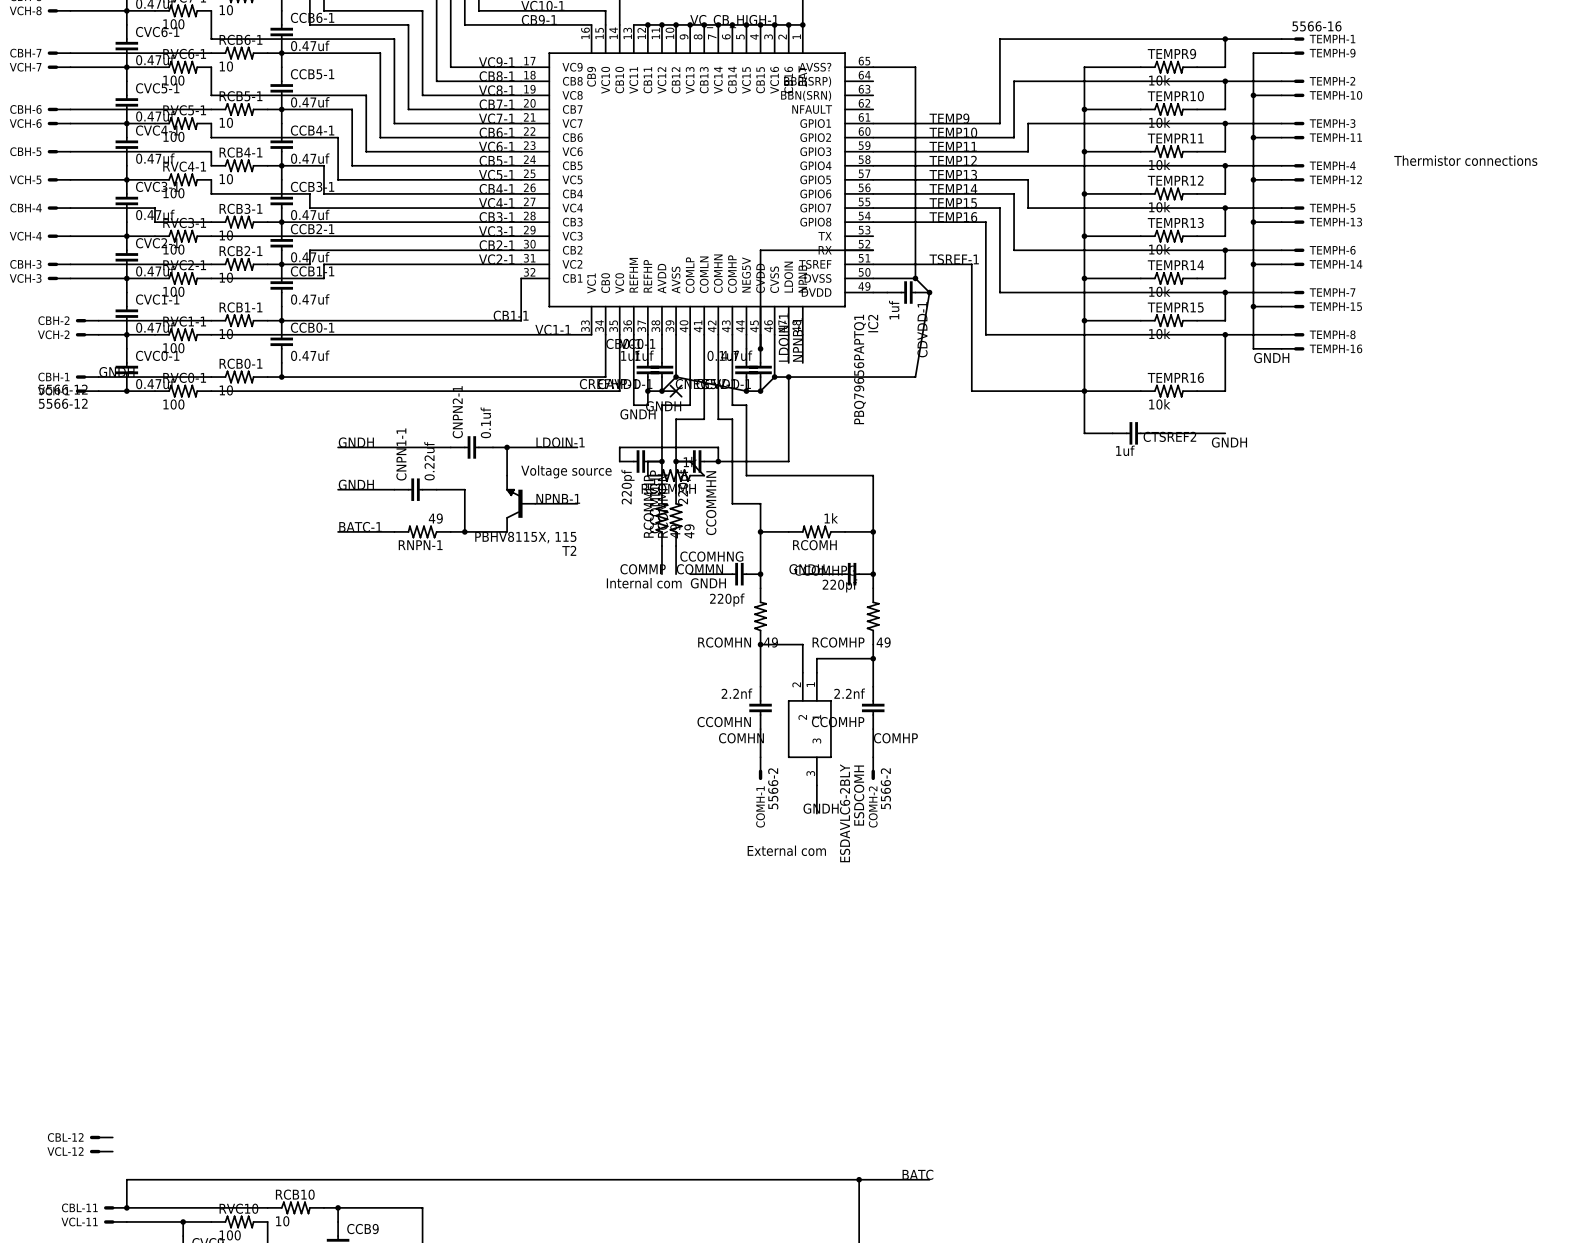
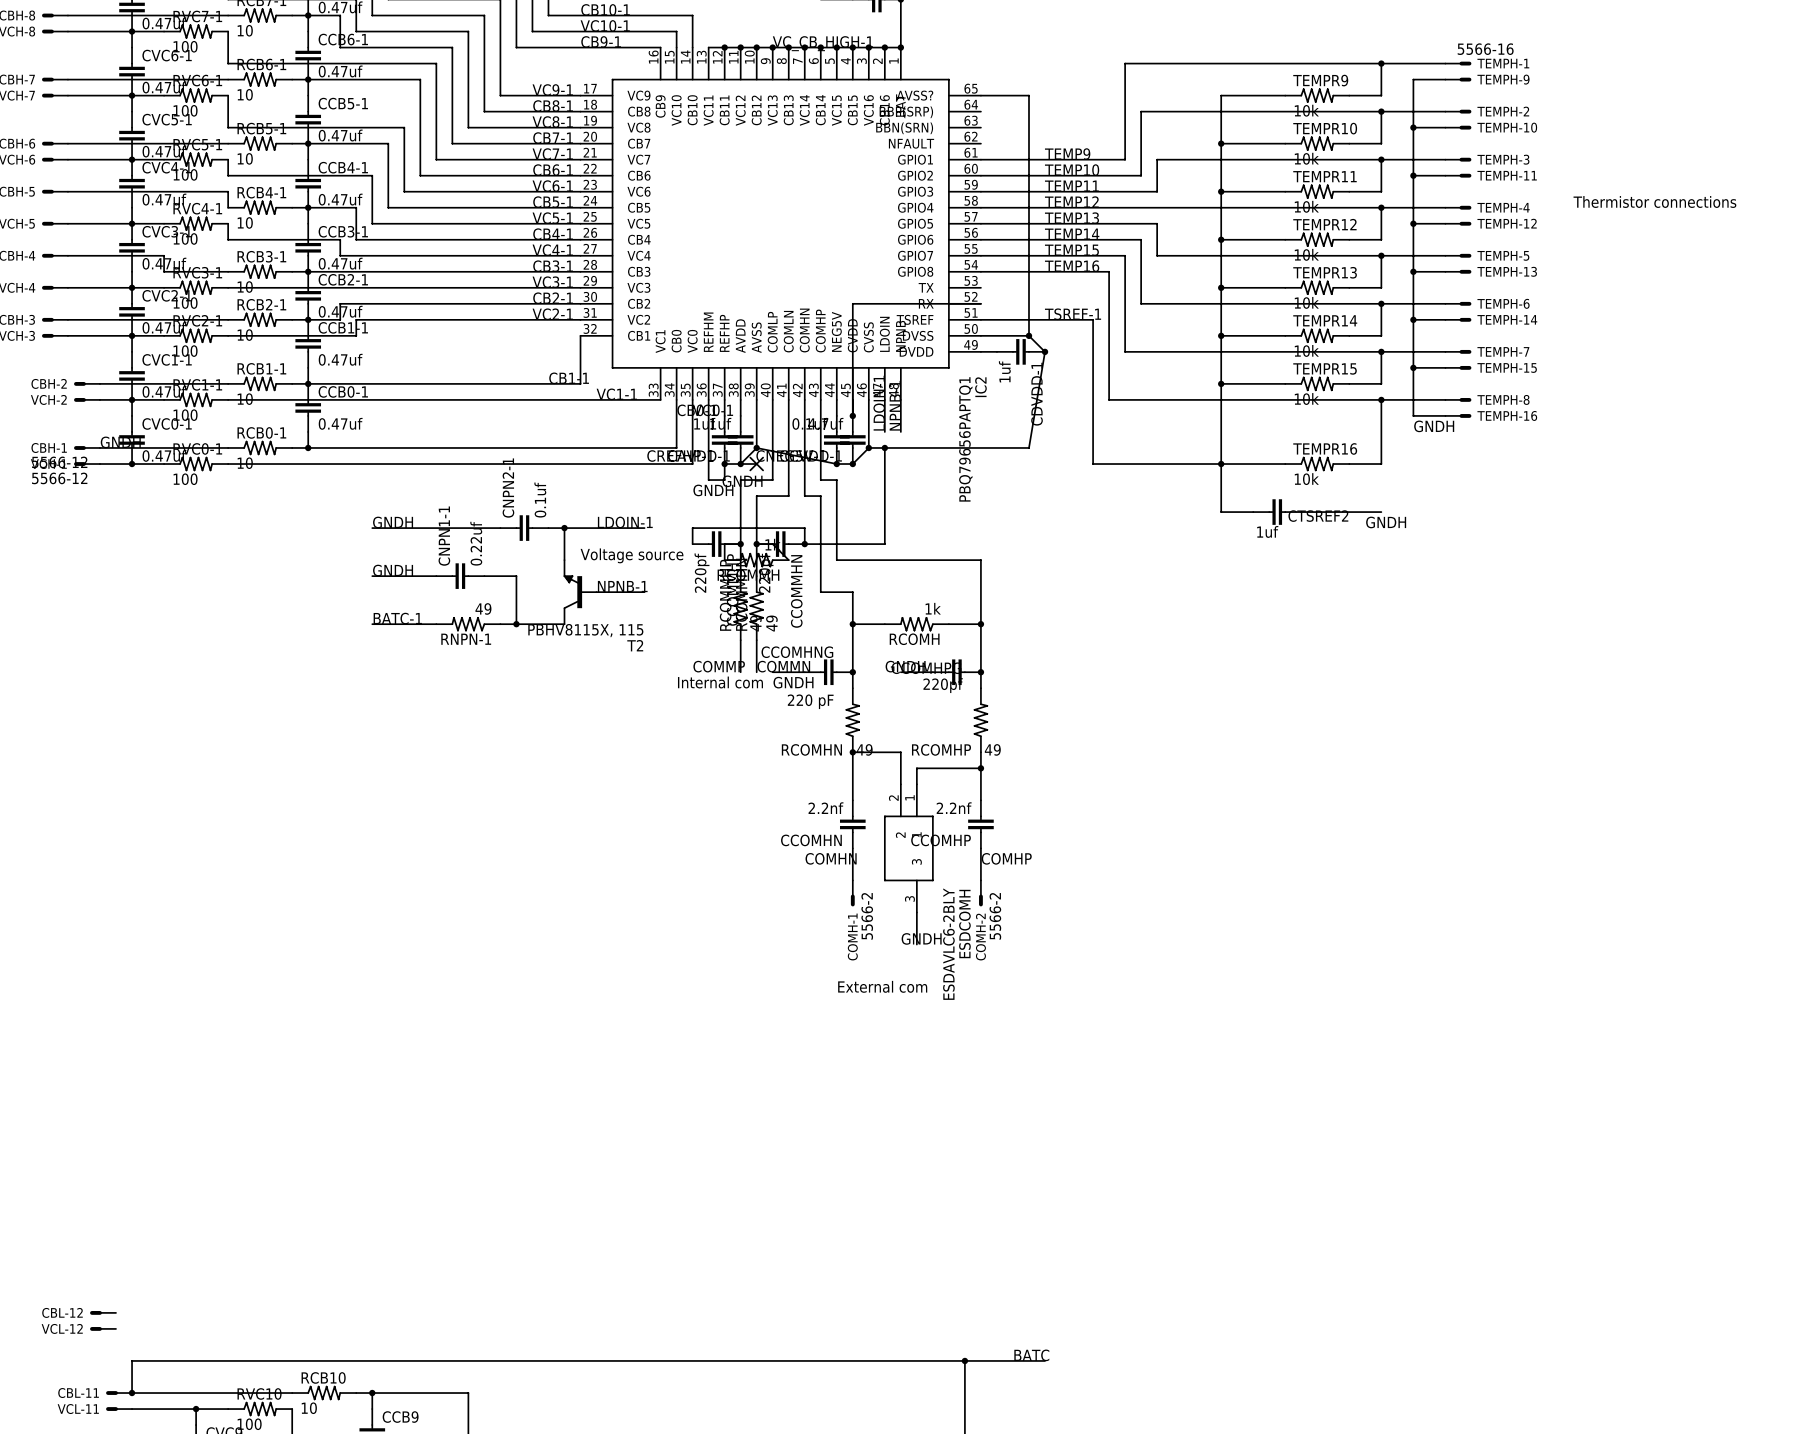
CCOMHNG value: 220pf (727, 600) -> 220 pF (810, 701)

